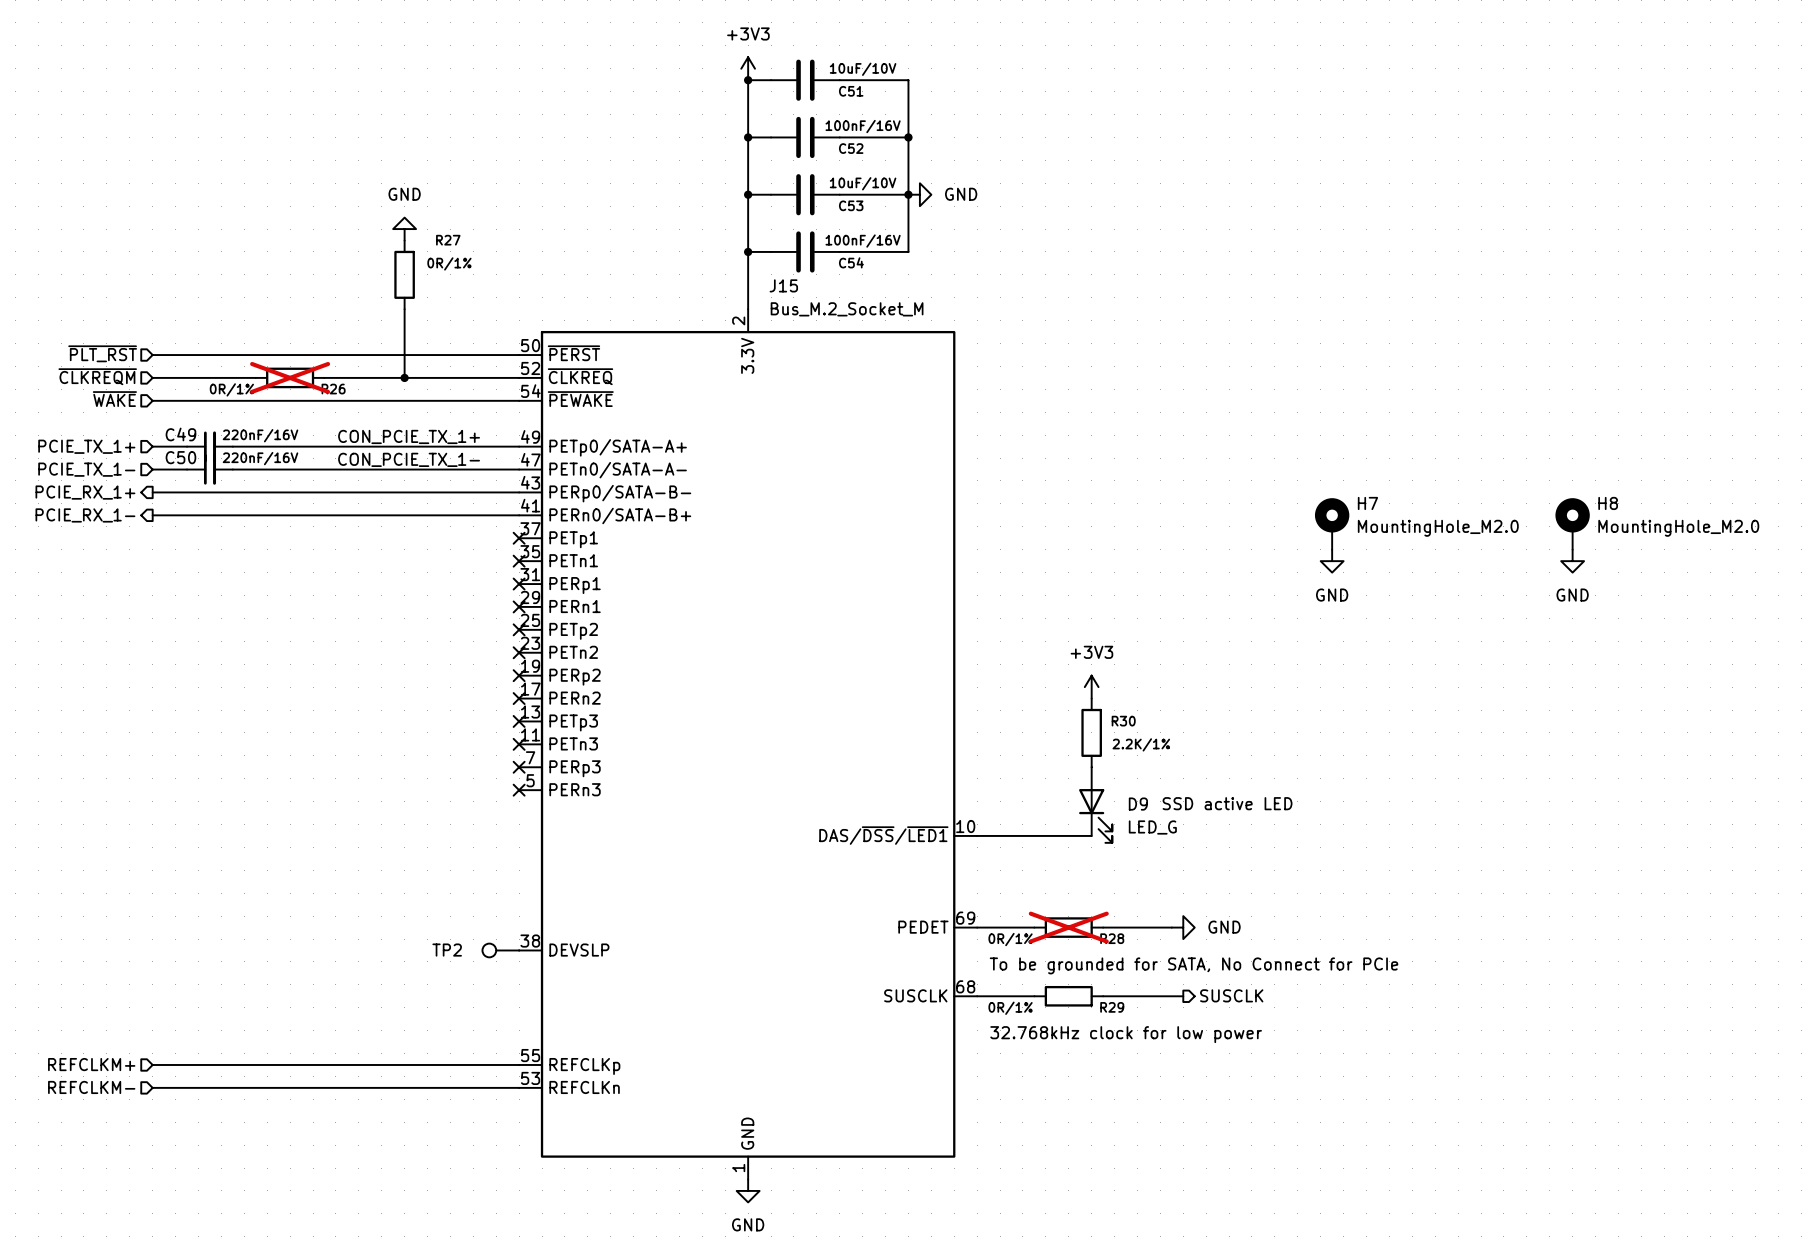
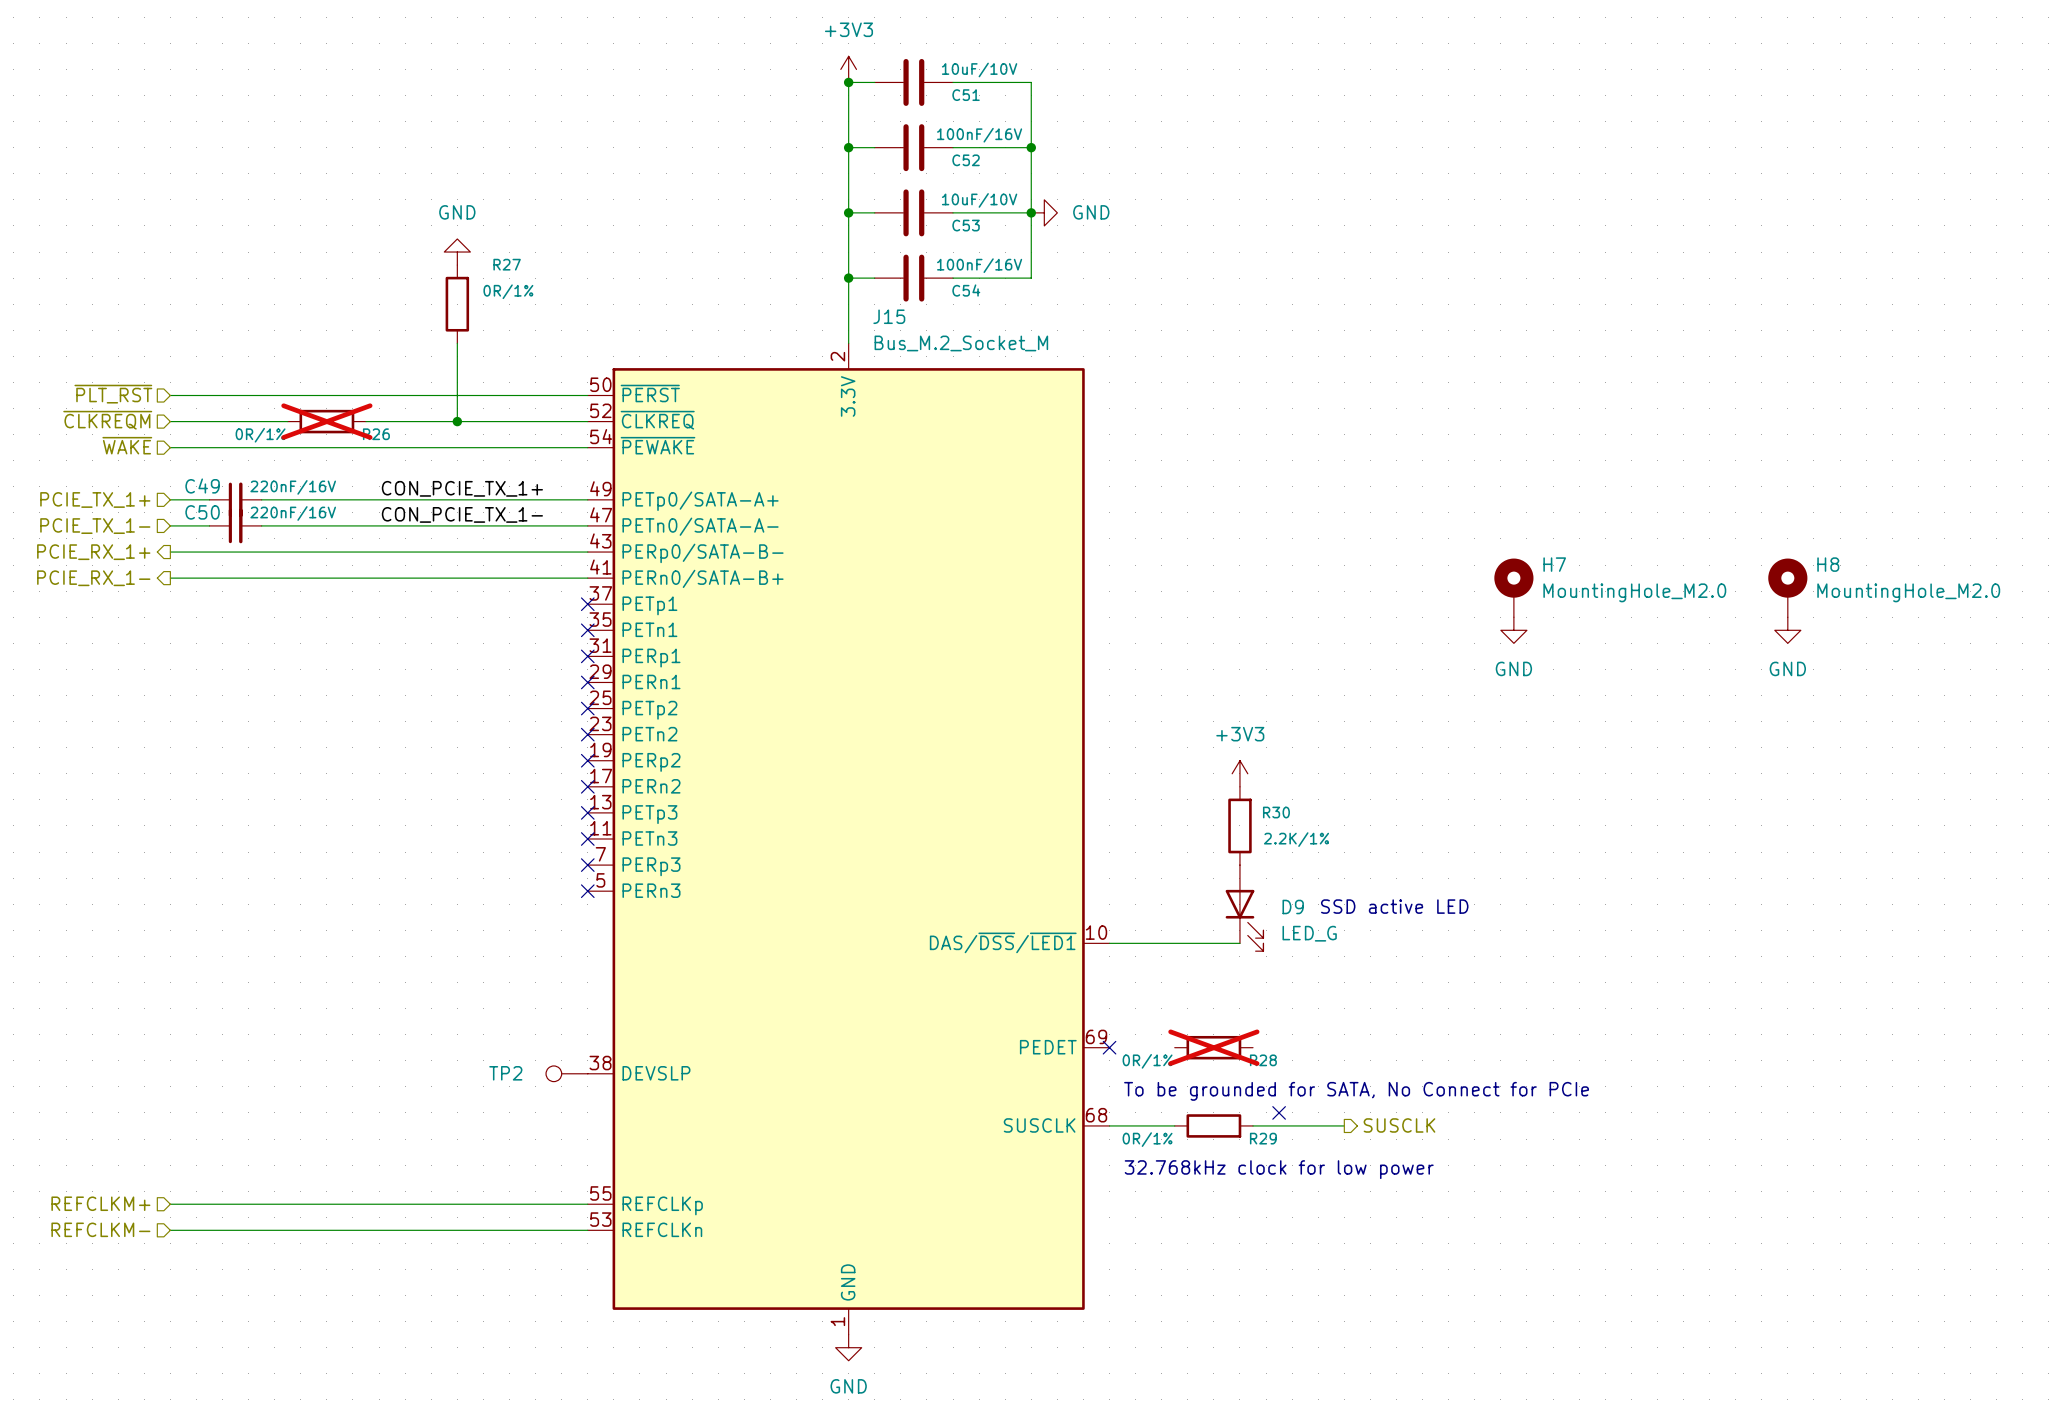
wire: (977, 927) (1034, 927) -> none
no-connect mark: none -> (1109, 1047)
wire: (1103, 927) (1171, 927) -> none
power symbol: GND (1183, 927) -> none
no-connect mark: none -> (1279, 1112)

